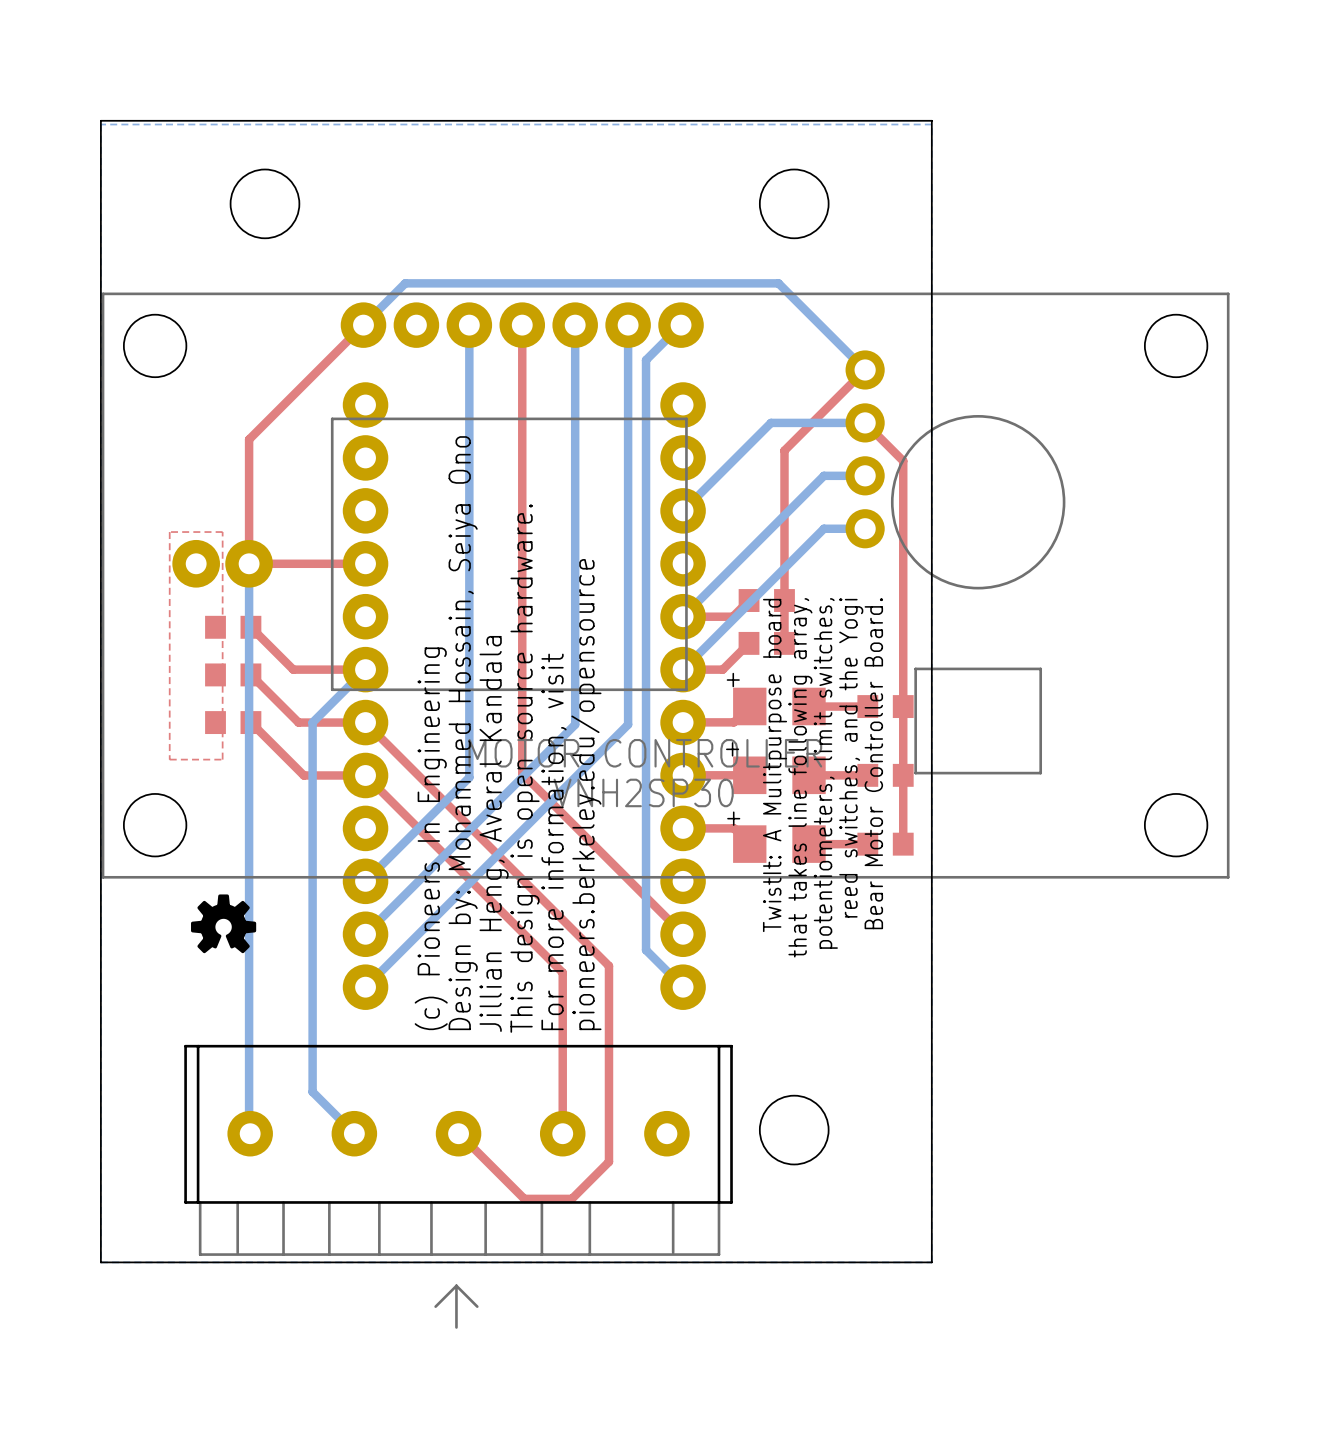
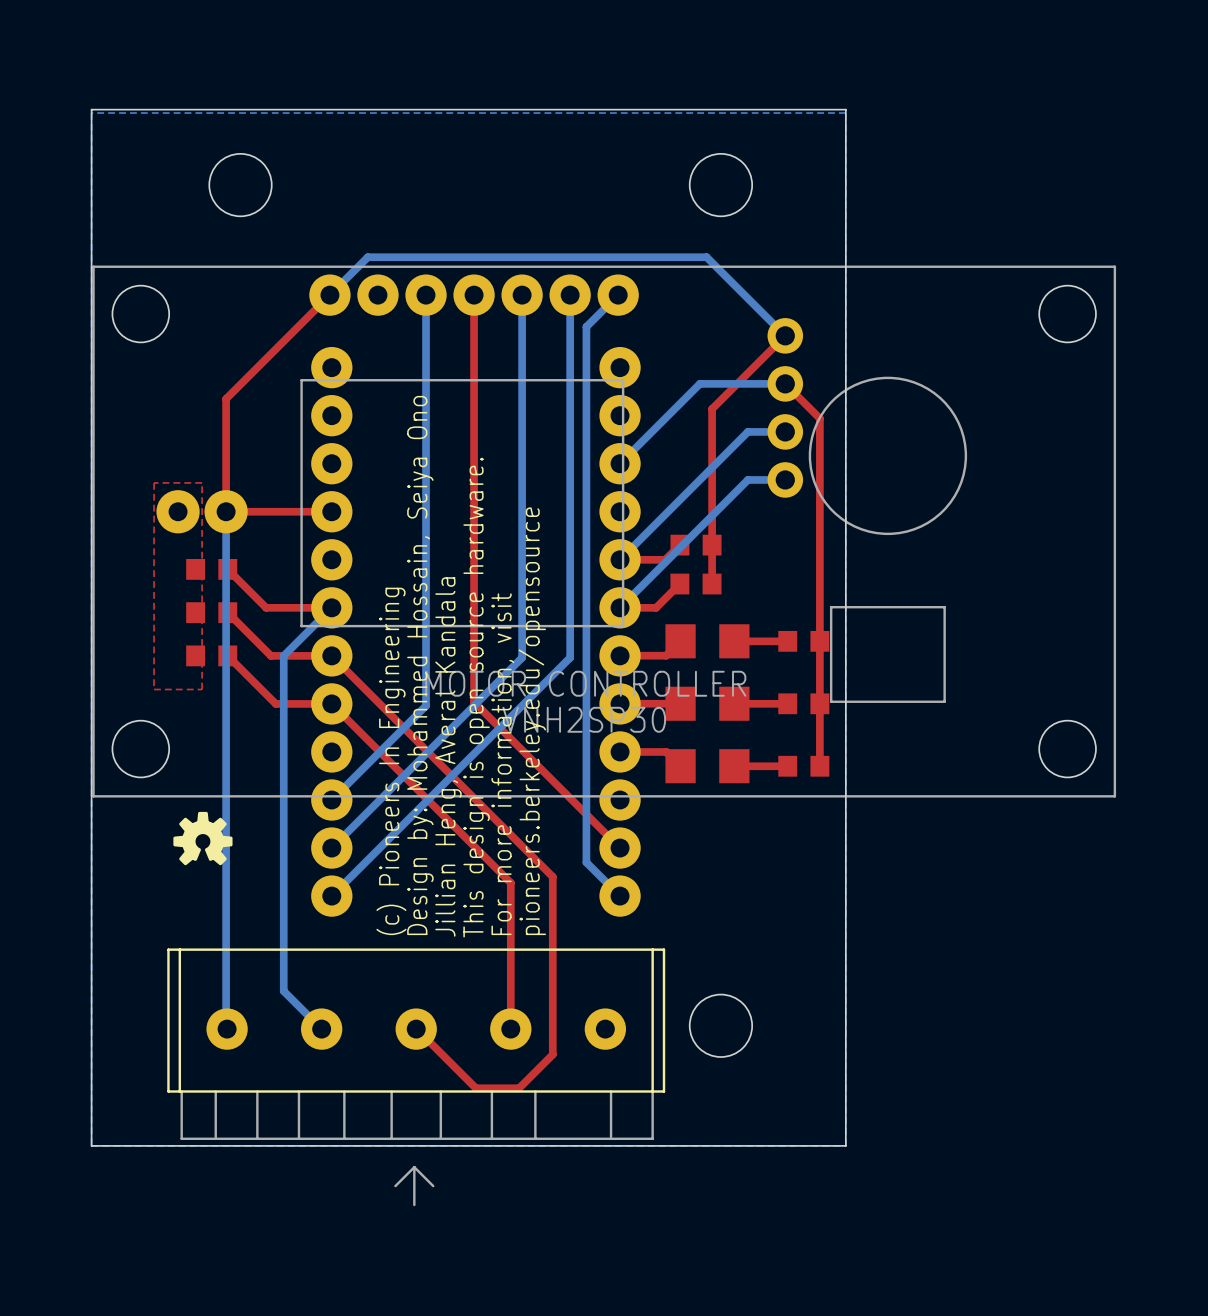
text: + (733, 680) -> none
text: + (732, 749) -> none
text: reed switches, and the Yogi (851, 757) -> none
text: Bear Motor Controller Board. (873, 763) -> none
text: TwistIt: A Mulitpurpose board (775, 765) -> none
text: potentiometers, limit switches, (825, 773) -> none
text: that takes line following array, (800, 777) -> none
text: + (733, 818) -> none

